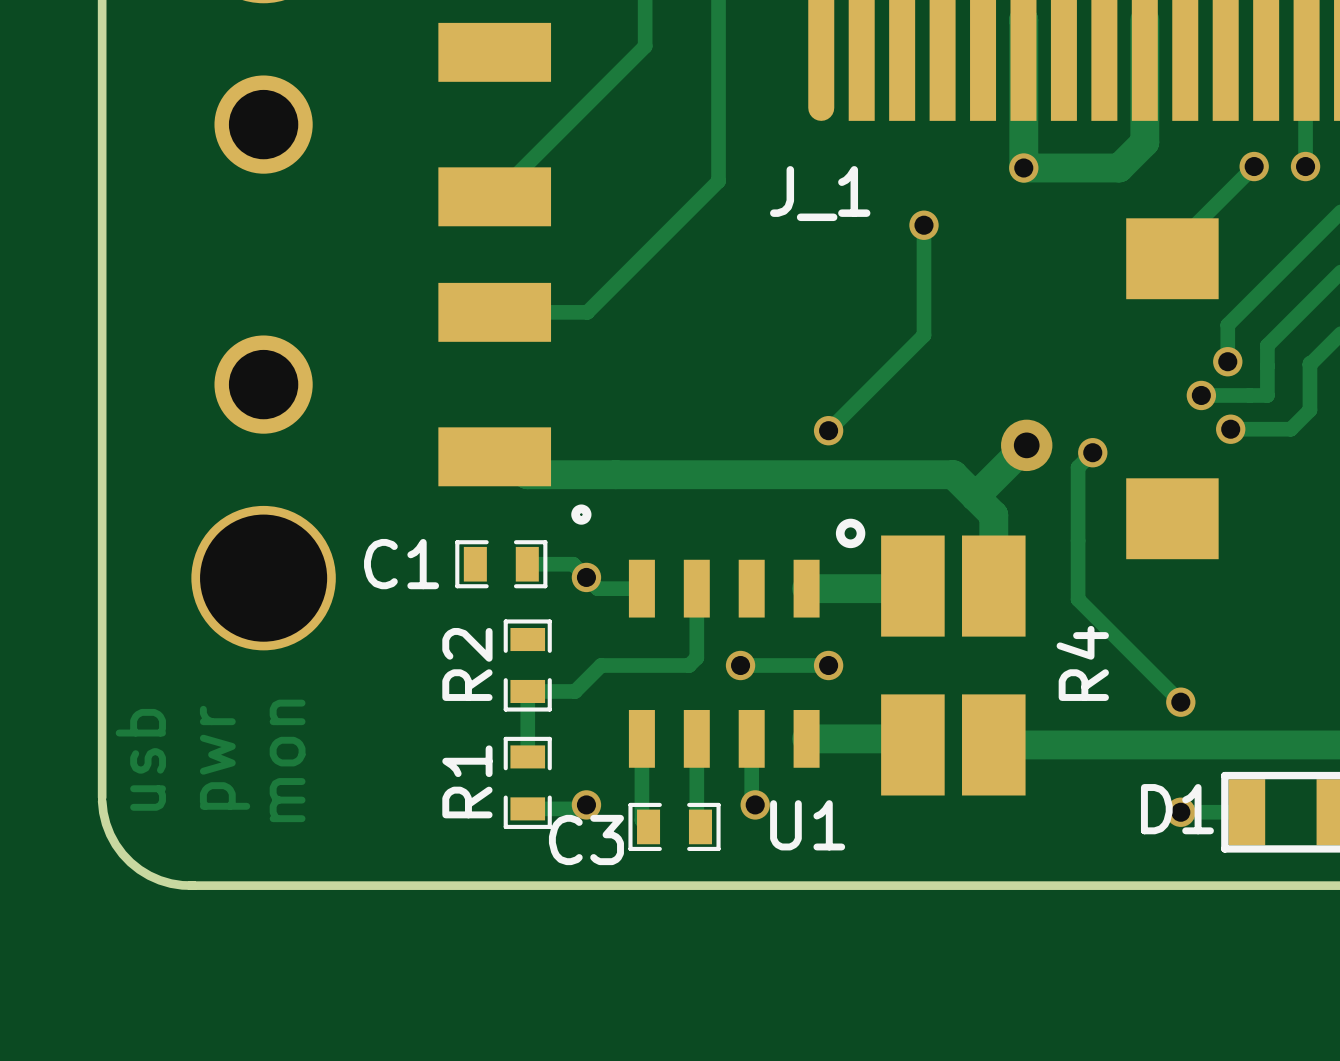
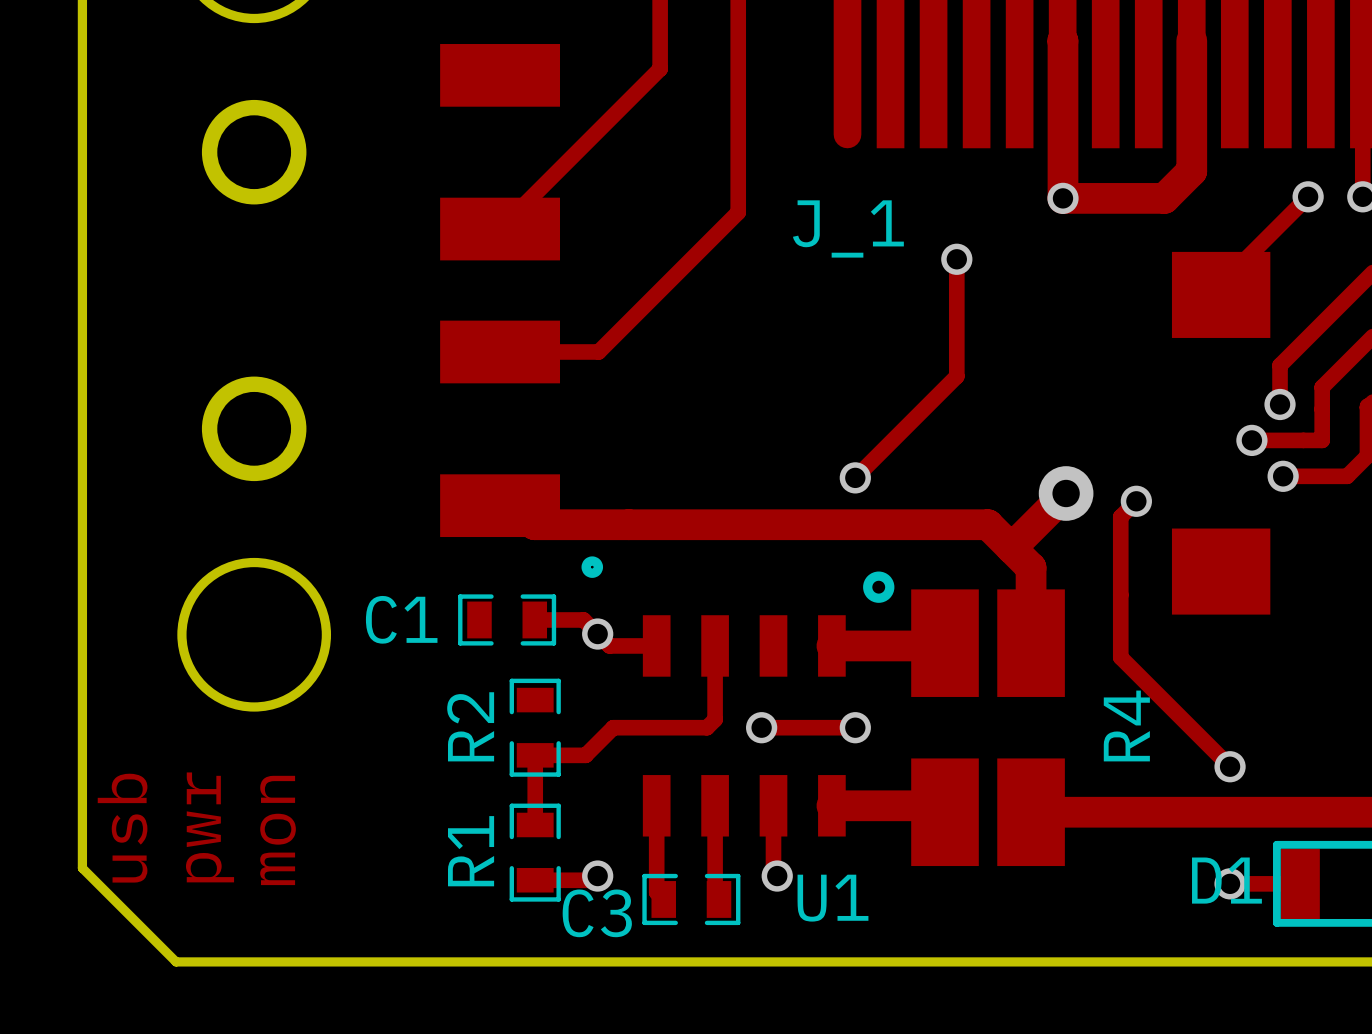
board edge: none -> (82, 868) (176, 961)
board edge: (102, 801) (106, 823) (110, 834) (115, 844) (130, 862) (149, 875) (159, 880) (182, 885) (193, 885) -> none

